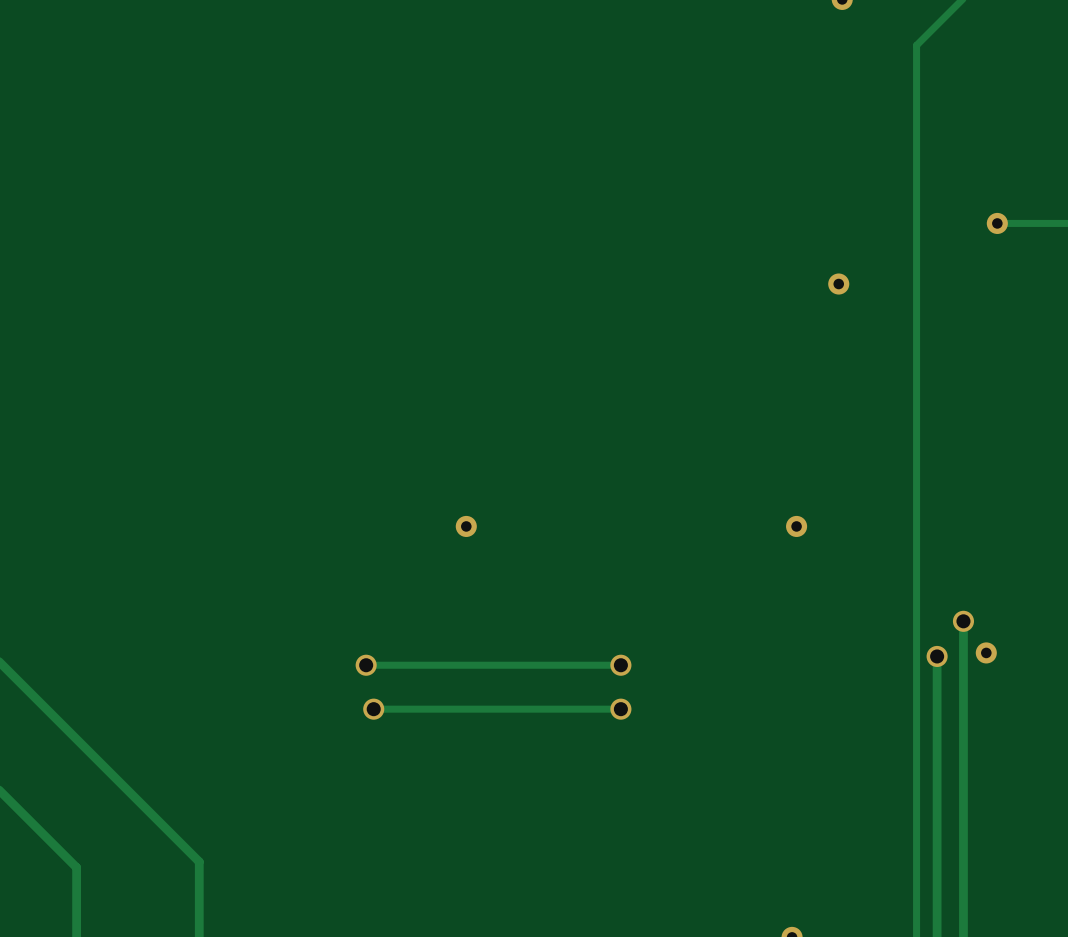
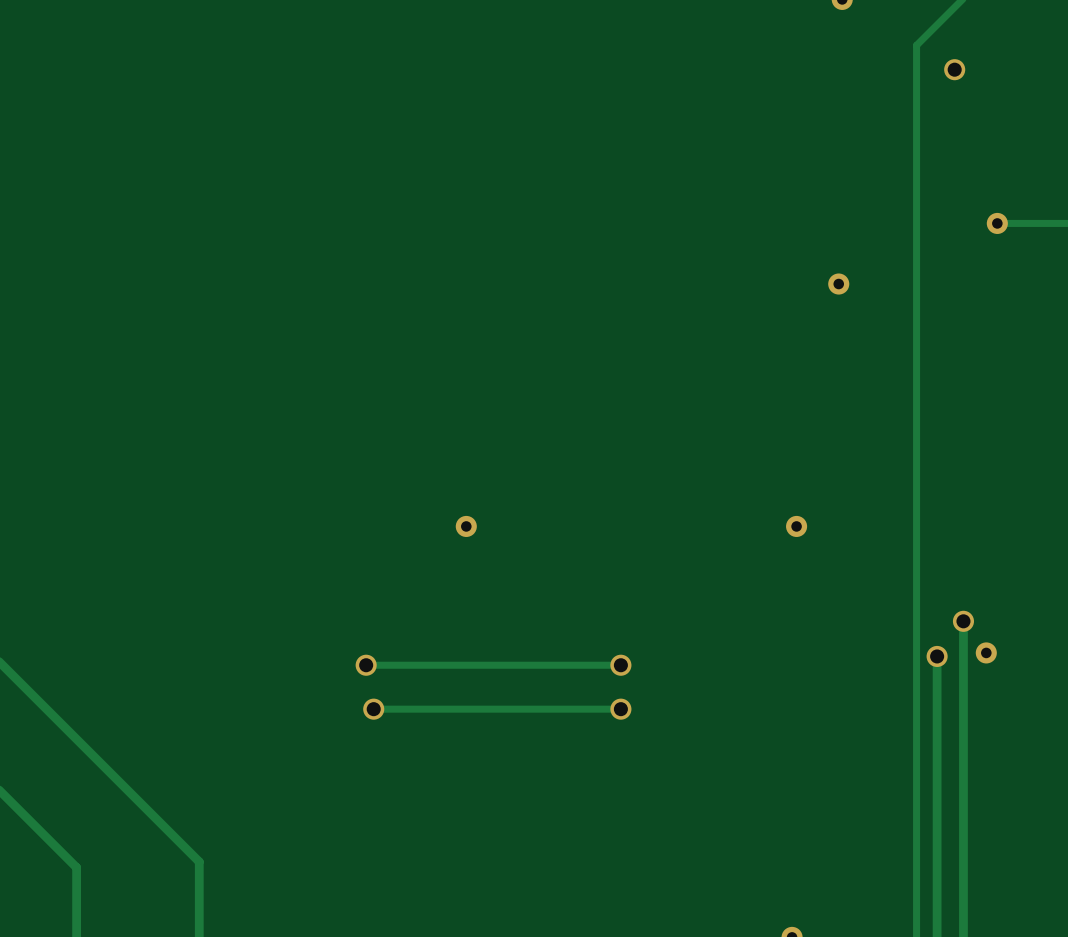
via: none -> (954, 69)

